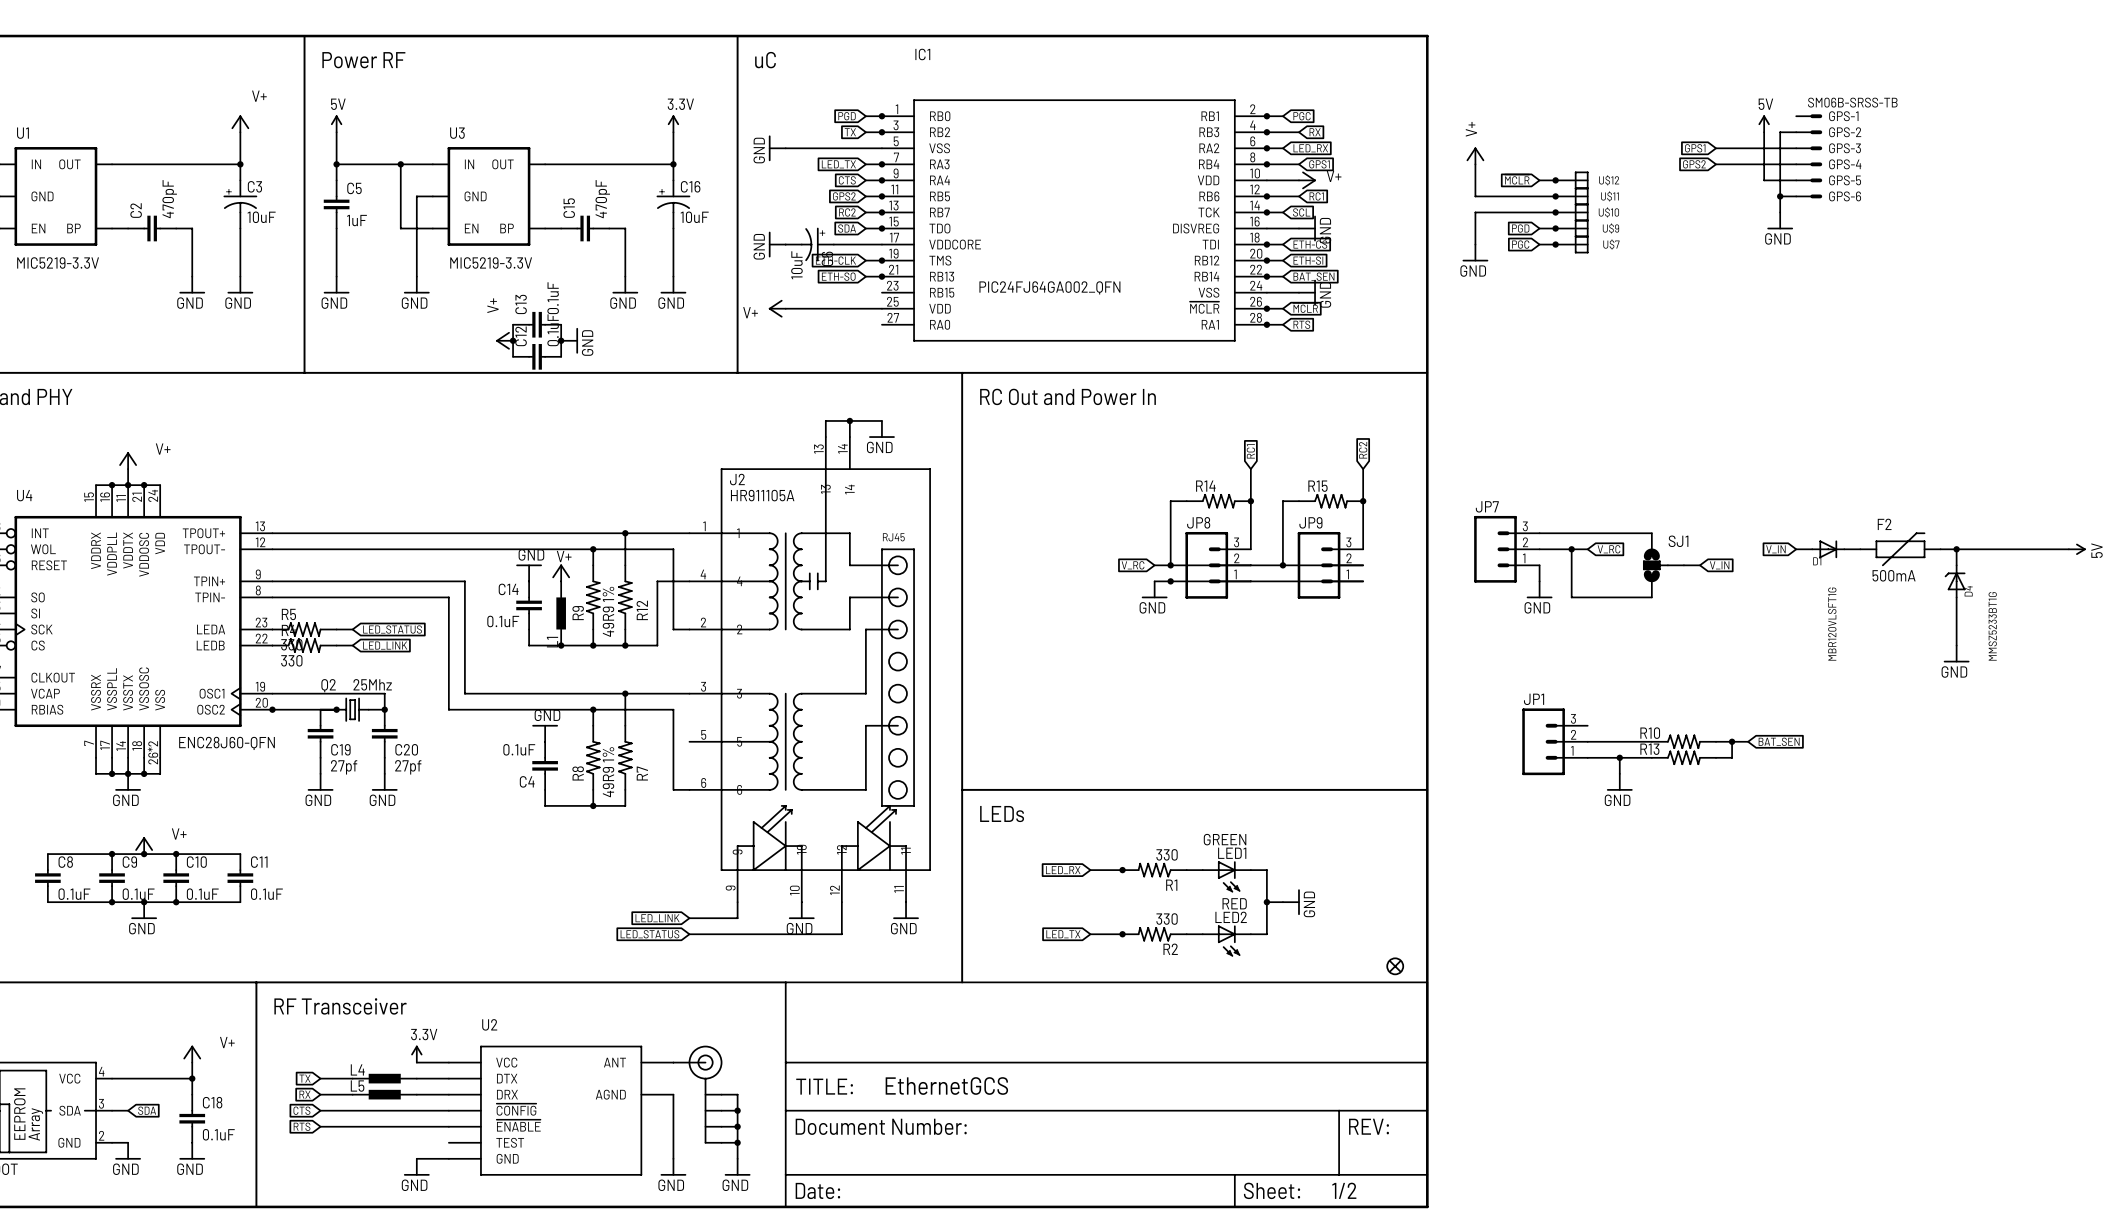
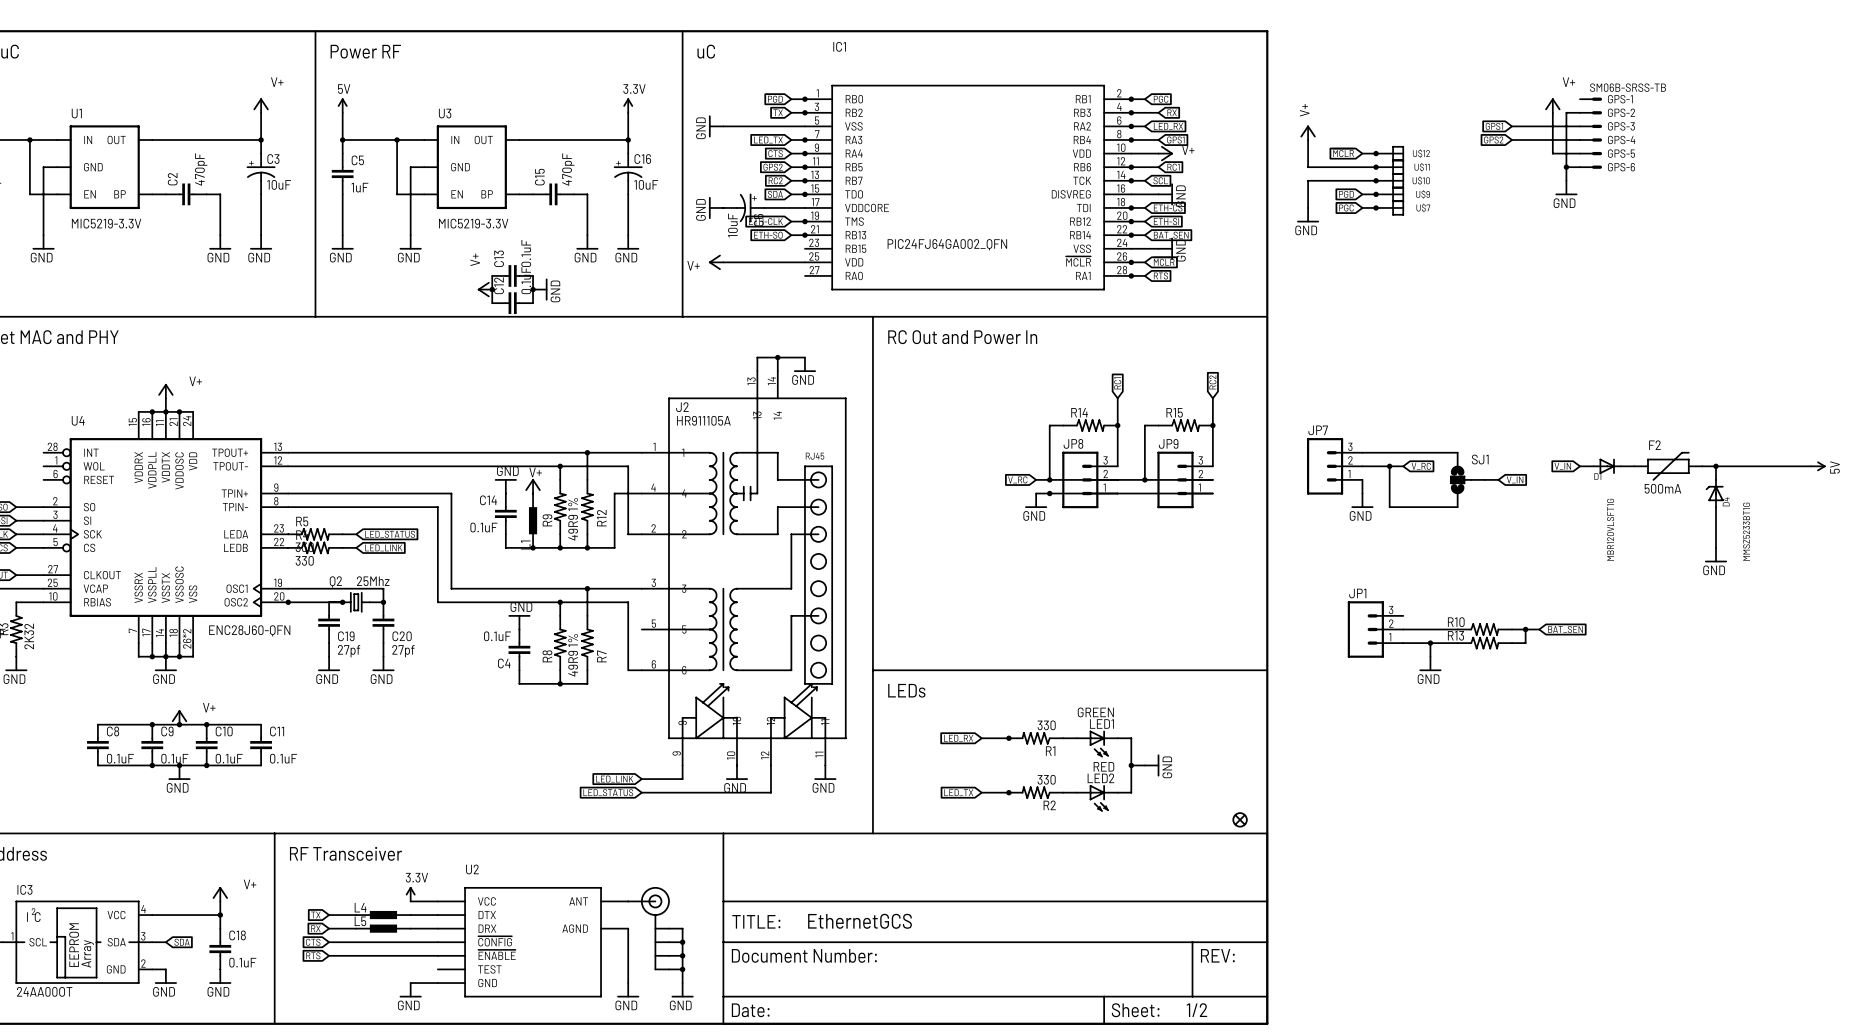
power symbol: 5V (1764, 123) -> V+ (1552, 105)

